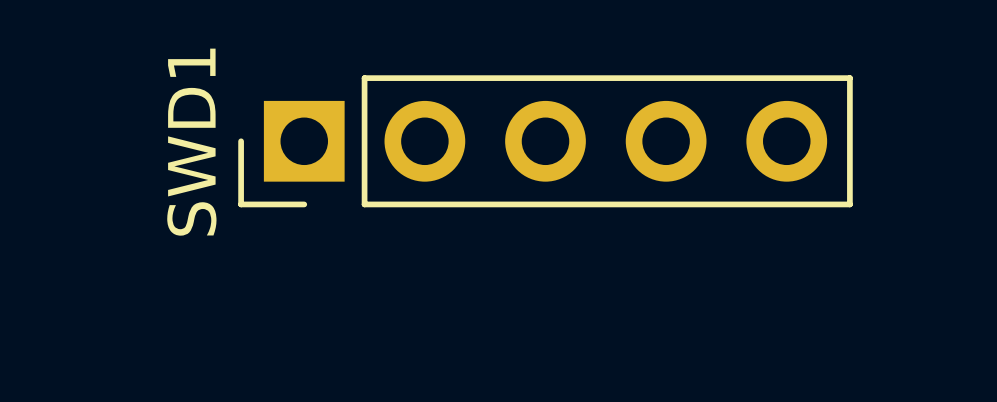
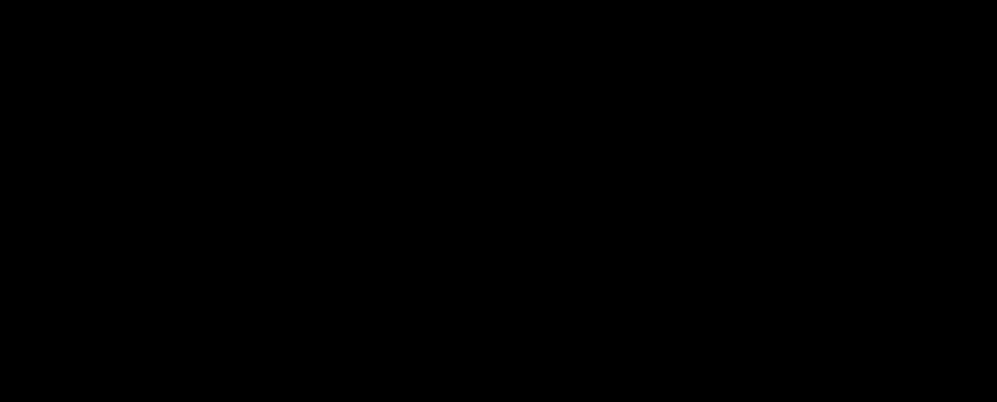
SWD1: (545, 141) -> none

